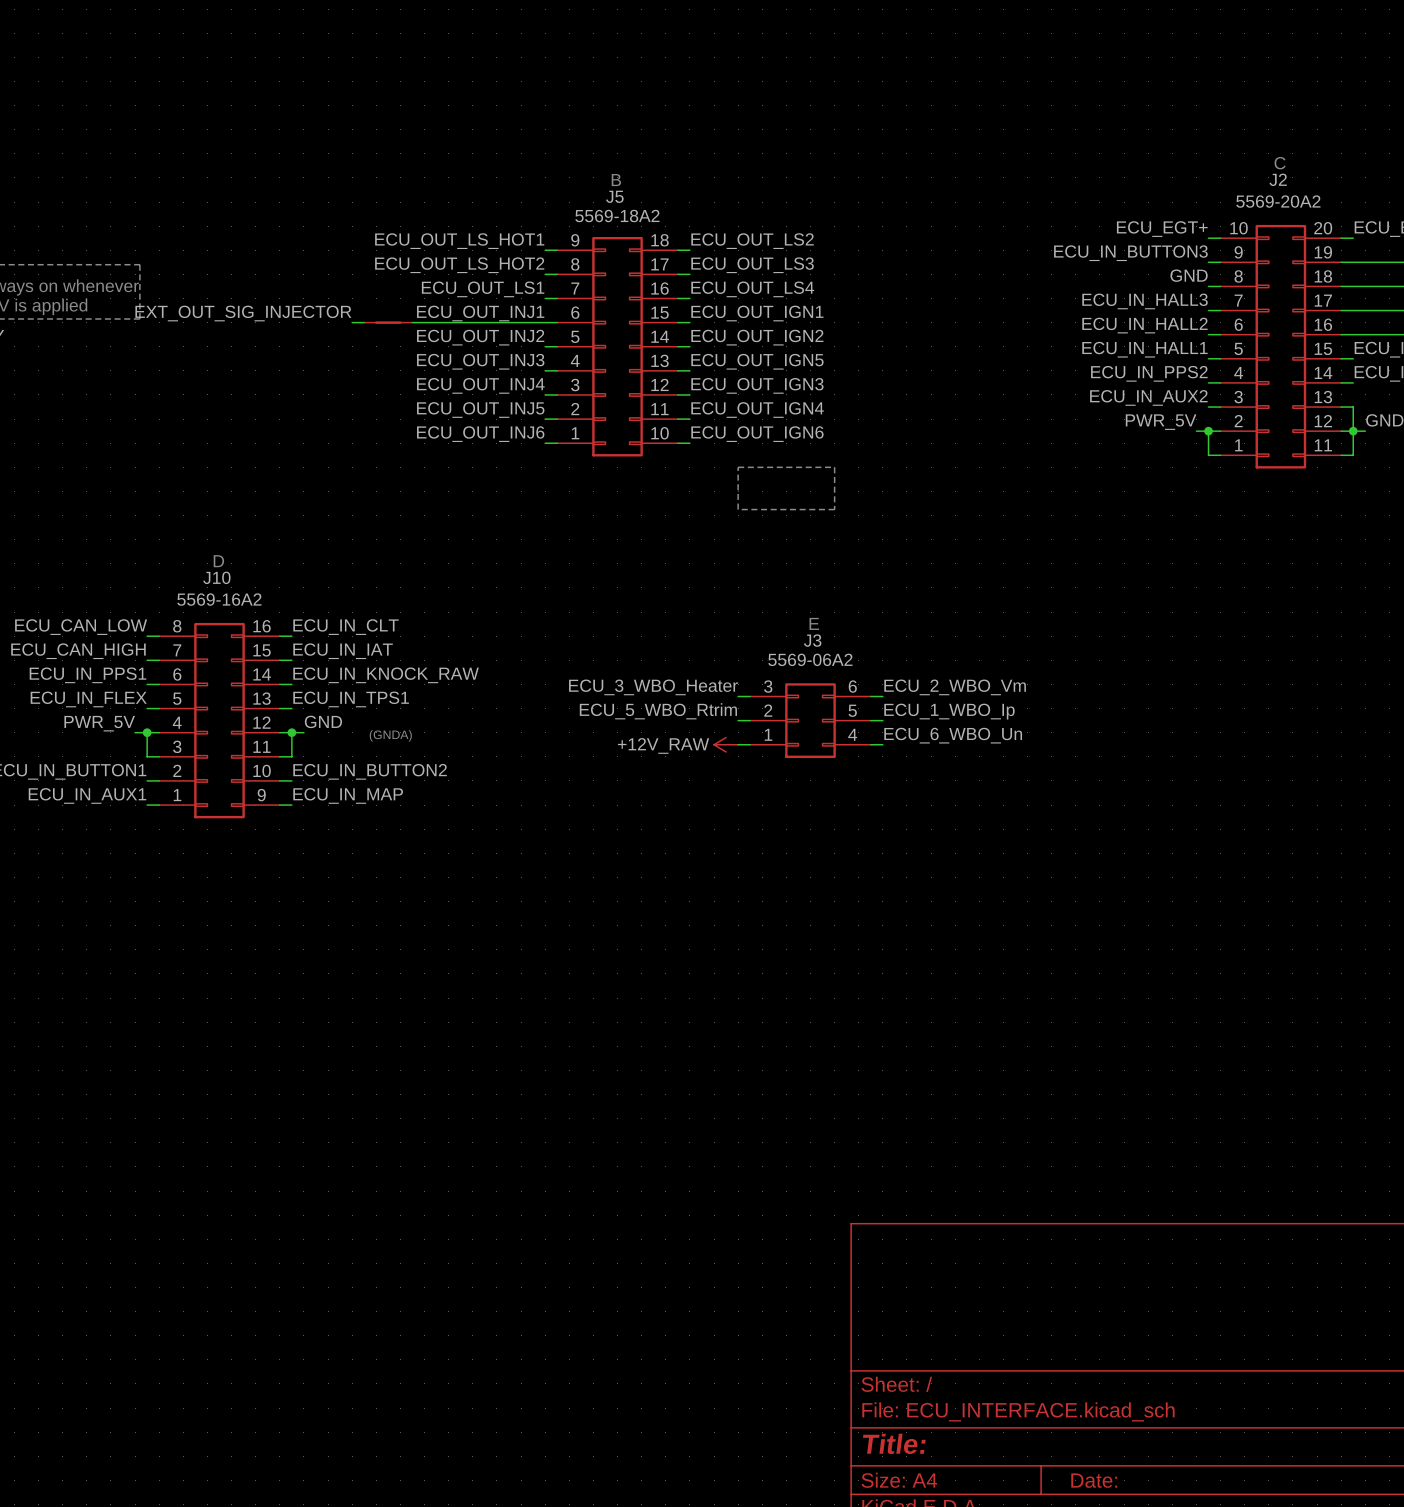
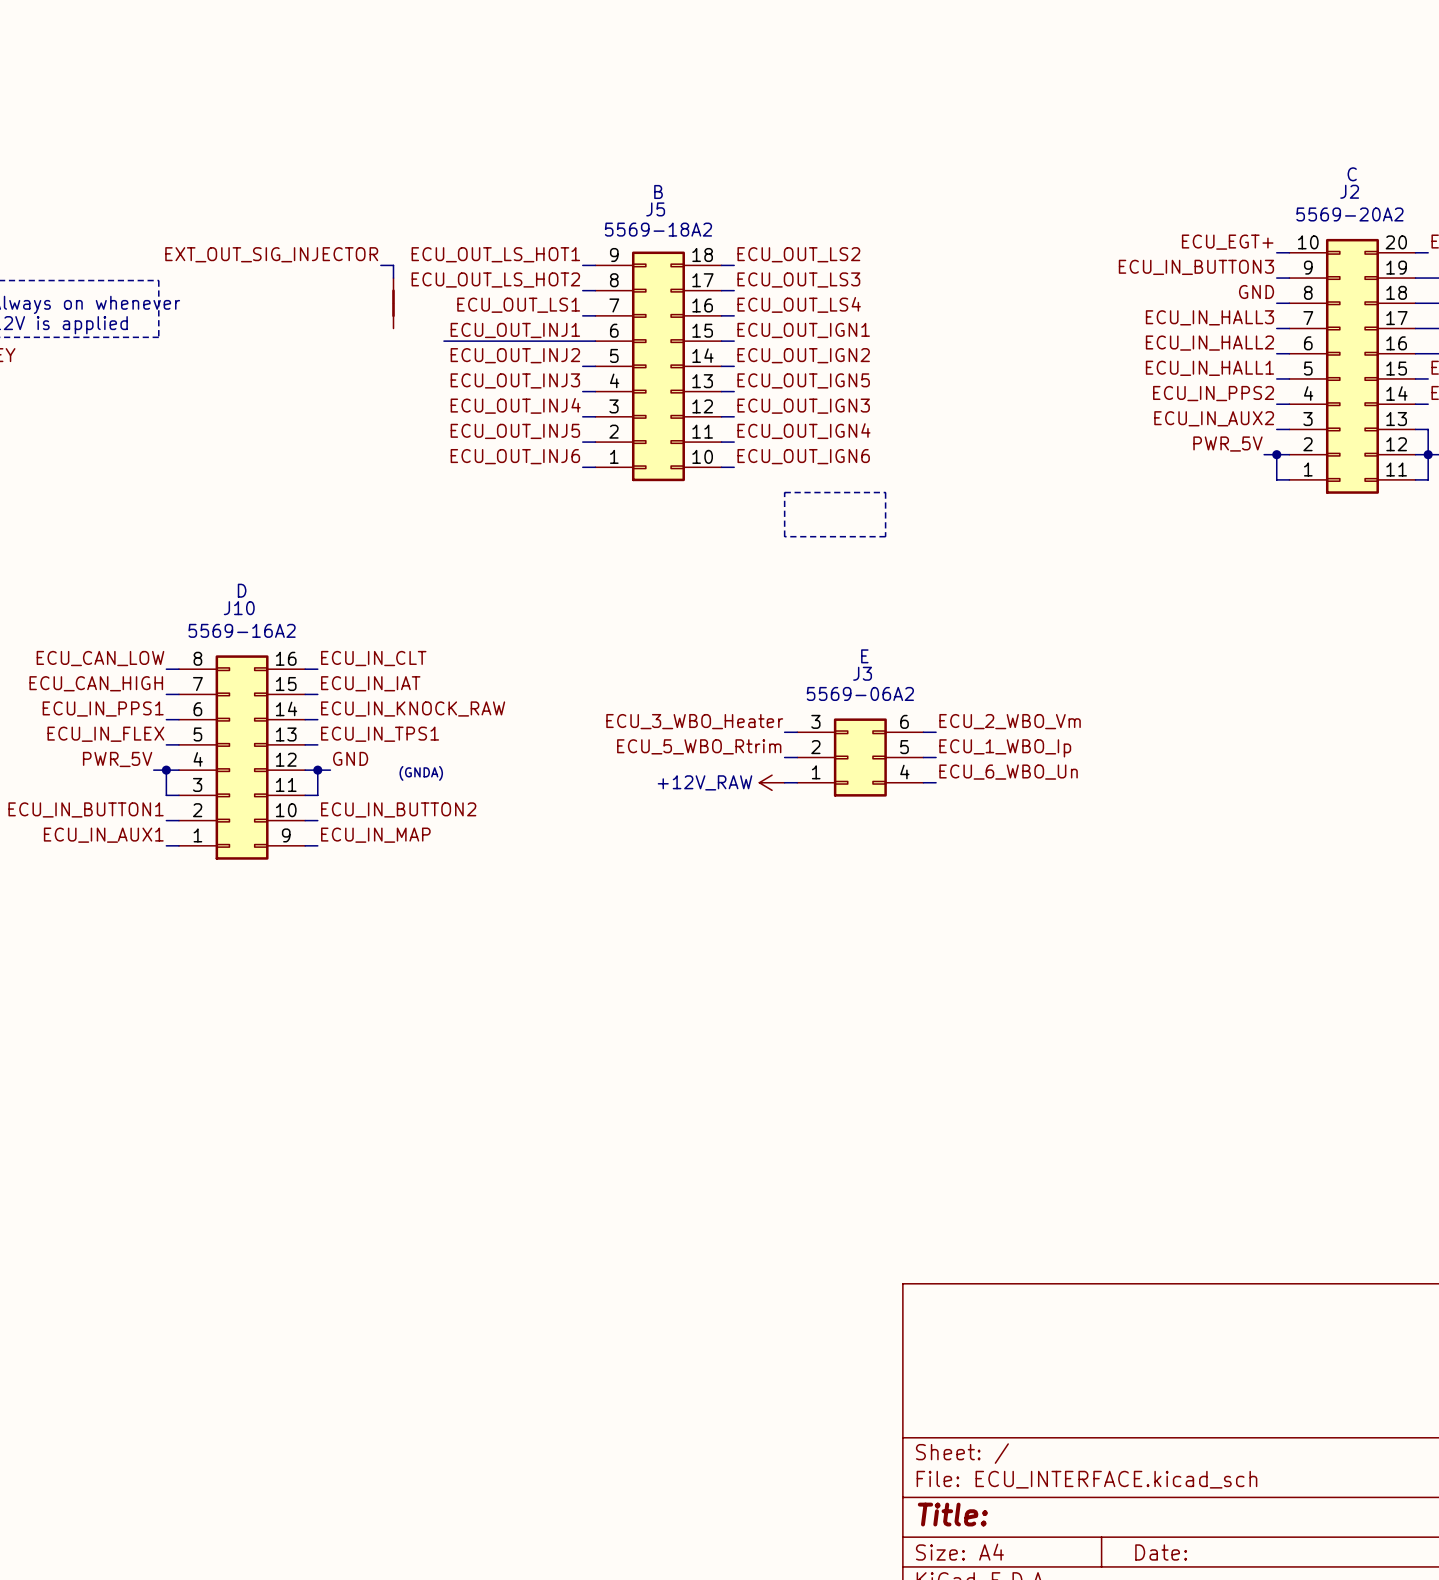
wire: none -> (380, 265) (393, 265) (393, 278)
label position: EXT_OUT_SIG_INJECTOR (243, 313) -> EXT_OUT_SIG_INJECTOR (271, 254)
wire: (352, 322) (364, 322) -> none
part rotation: 0° (388, 322) -> 90° clockwise (393, 303)
part position: (388, 322) -> (393, 303)

